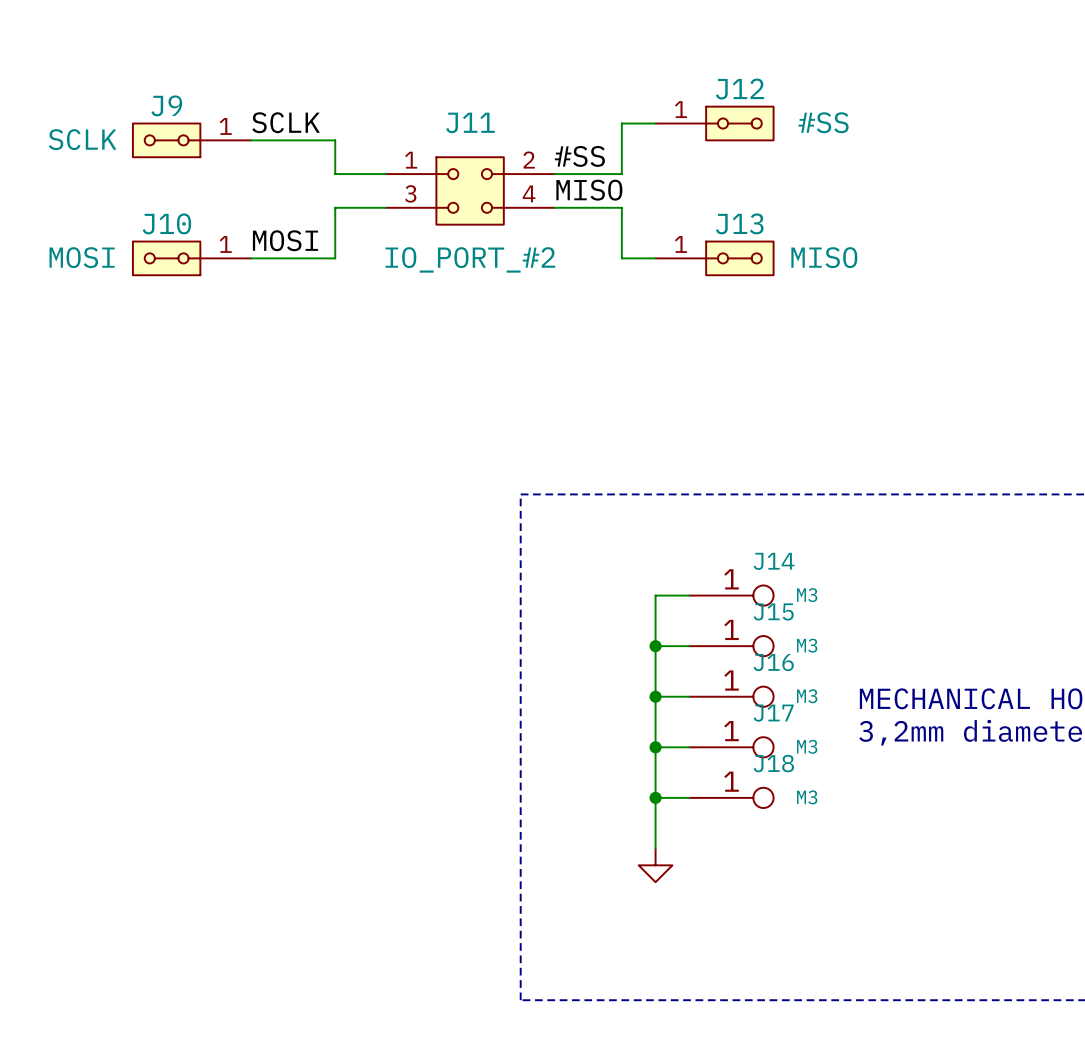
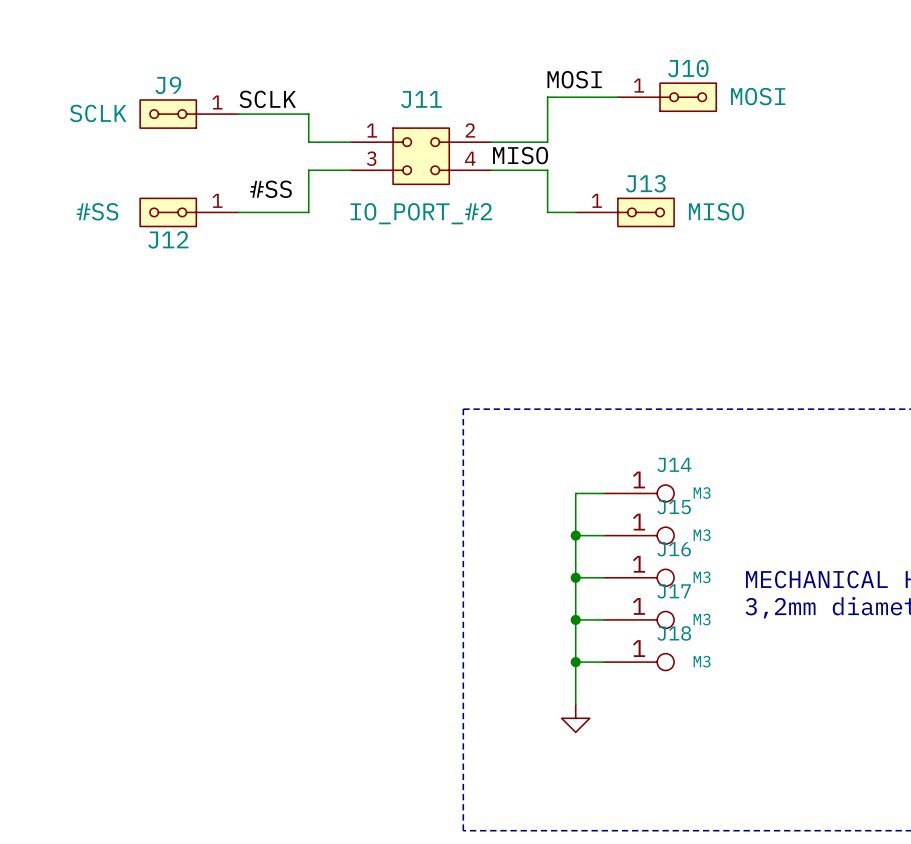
label: none -> MOSI (574, 79)
J10: none -> MOSI (667, 97)
wire: (621, 123) (655, 123) -> (547, 100) (547, 97) (617, 97)
J12: #SS (714, 123) -> none
label position: #SS (579, 156) -> #SS (270, 189)
J10 name: J10 (166, 223) -> J12 (168, 239)
label: MOSI (285, 240) -> none
J10 value: MOSI (82, 257) -> #SS (97, 211)

